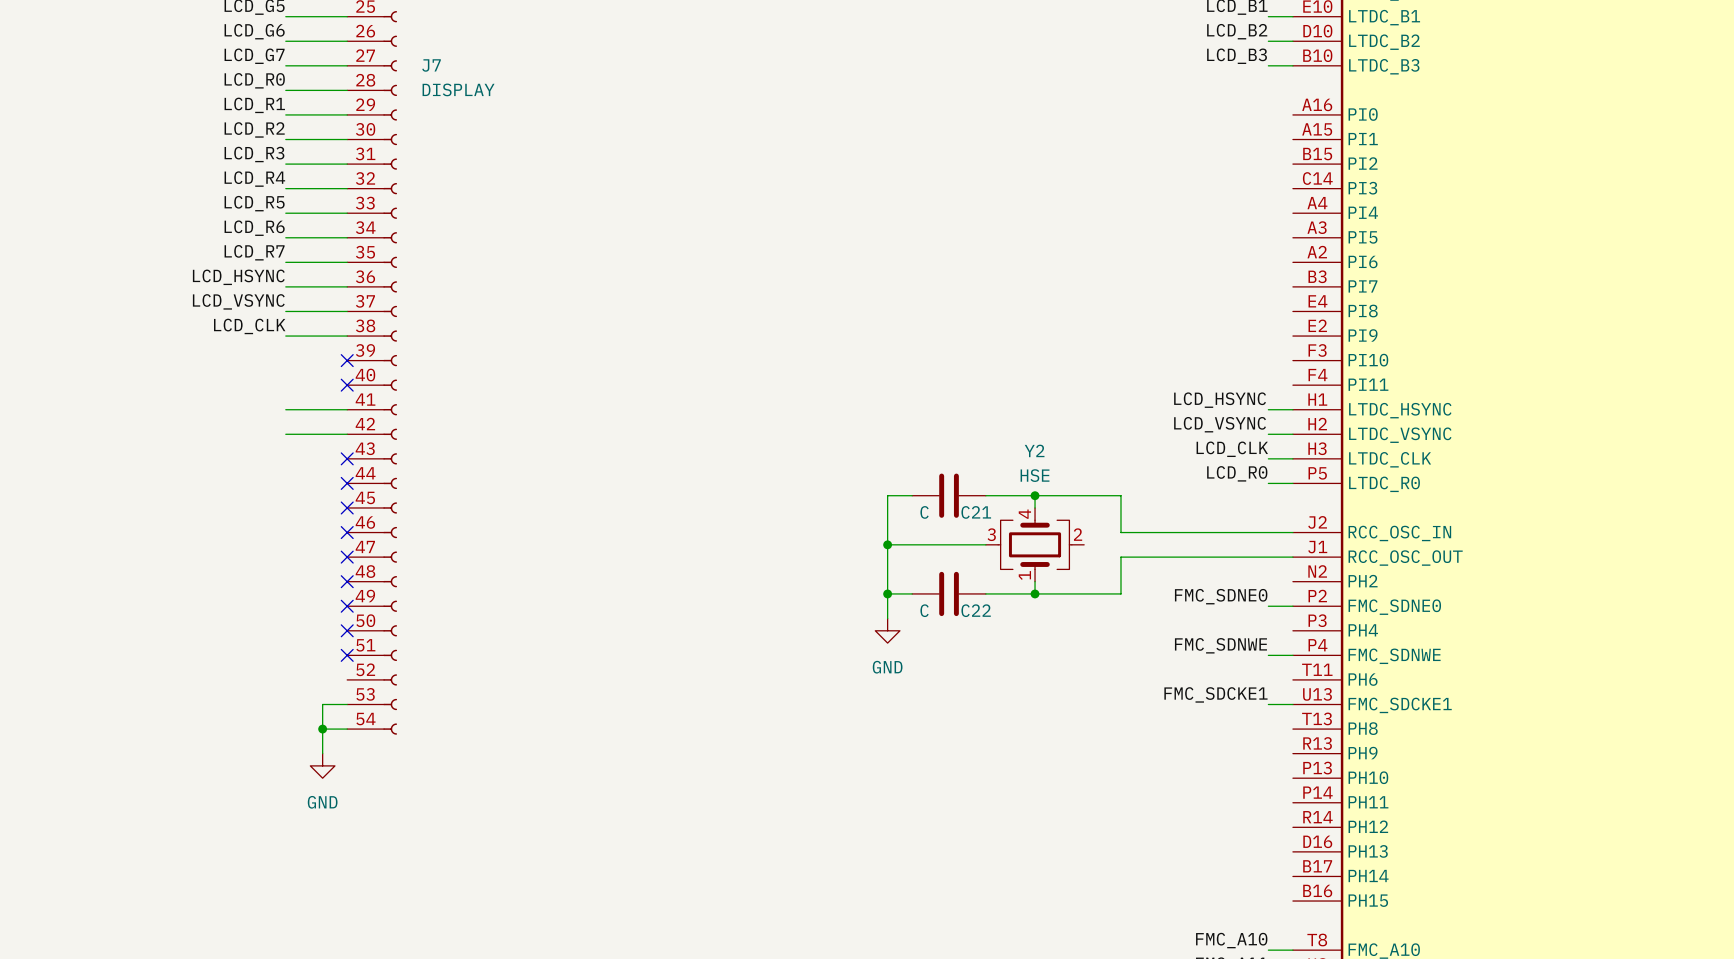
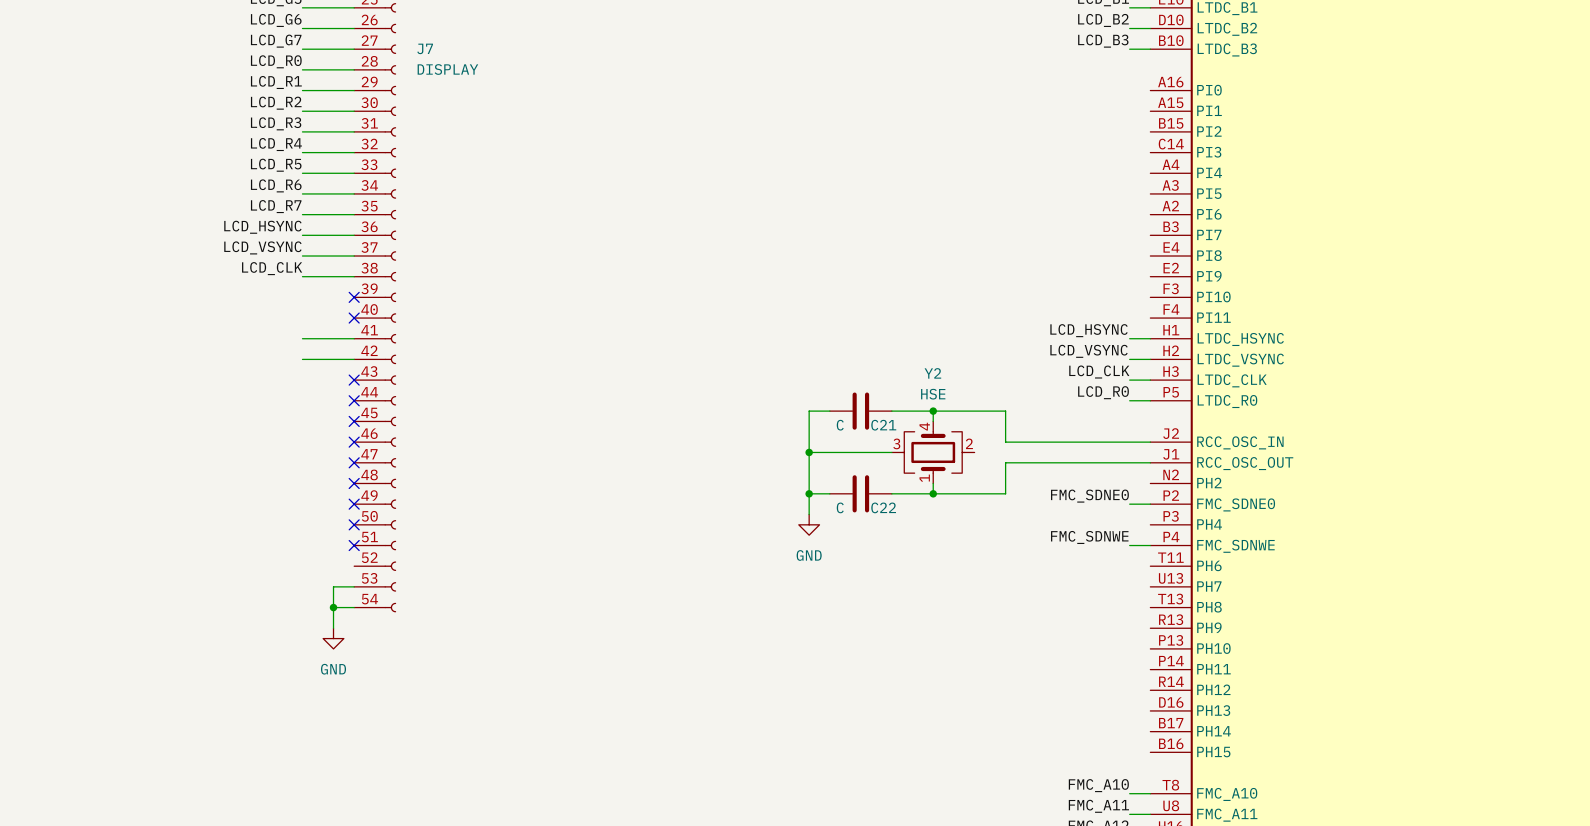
label: FMC_SDCKE1 (1215, 694) -> none
wire: (1268, 704) (1292, 704) -> none
part pin name: FMC_SDCKE1 (1400, 705) -> PH7 (1209, 586)

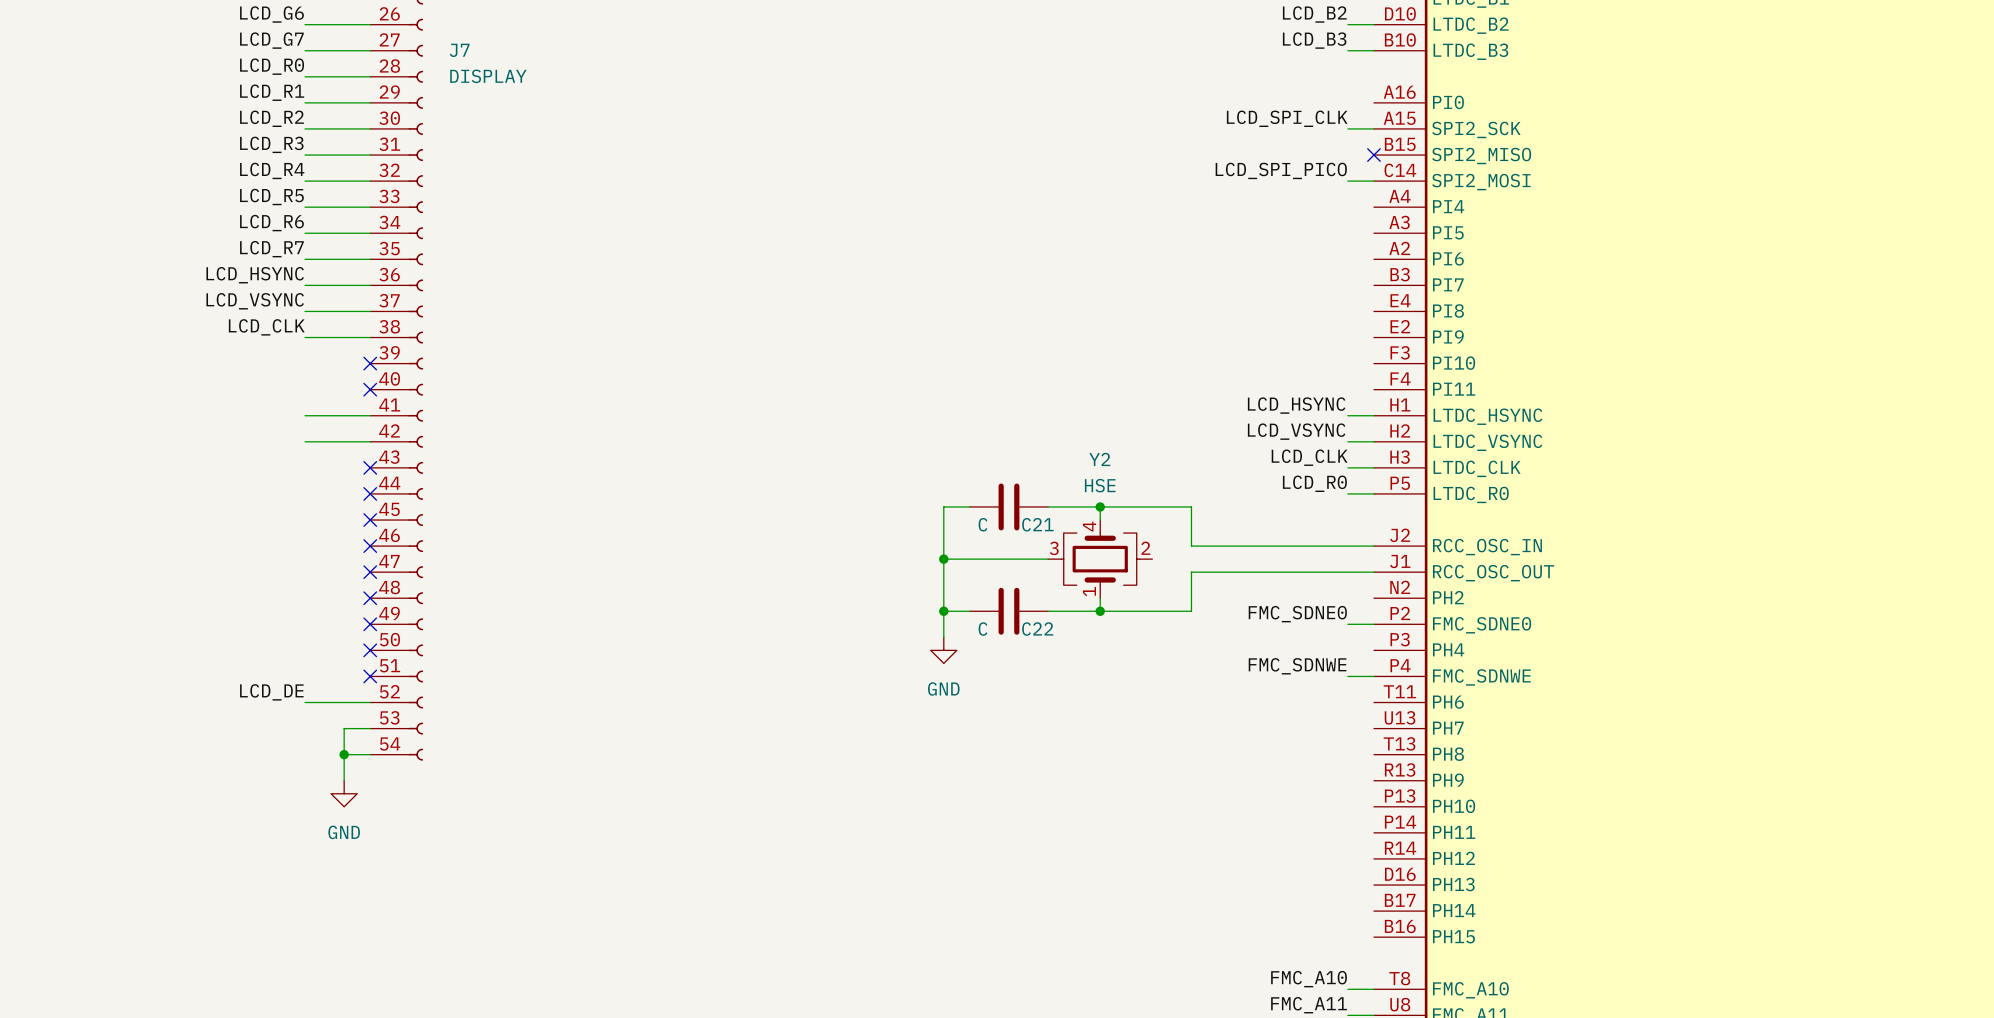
label: none -> LCD_SPI_CLK (1287, 118)
part pin name: PI1 (1209, 110) -> SPI2_SCK (1476, 129)
wire: none -> (1347, 128) (1373, 128)
no-connect mark: none -> (1373, 155)
part pin name: PI2 (1209, 131) -> SPI2_MISO (1481, 156)
label: none -> LCD_SPI_PICO (1281, 170)
wire: none -> (1347, 181) (1373, 181)
part pin name: PI3 (1209, 152) -> SPI2_MOSI (1481, 182)
label: none -> LCD_DE (271, 692)
wire: none -> (305, 702) (370, 702)

